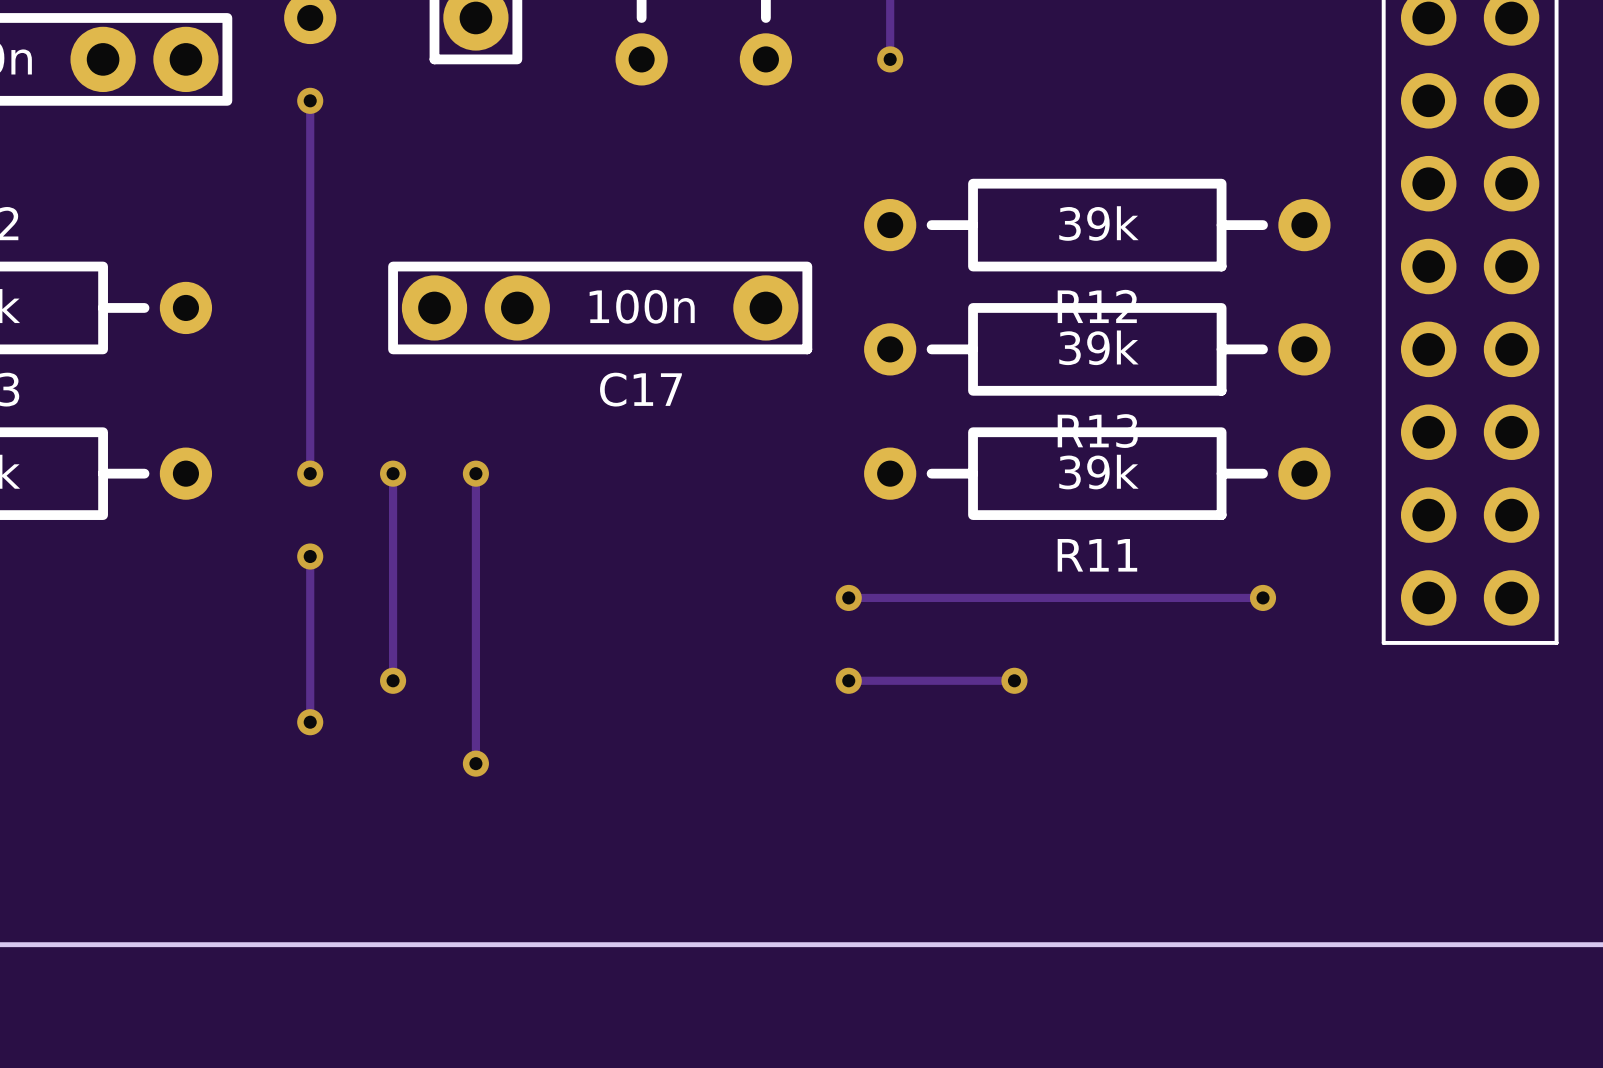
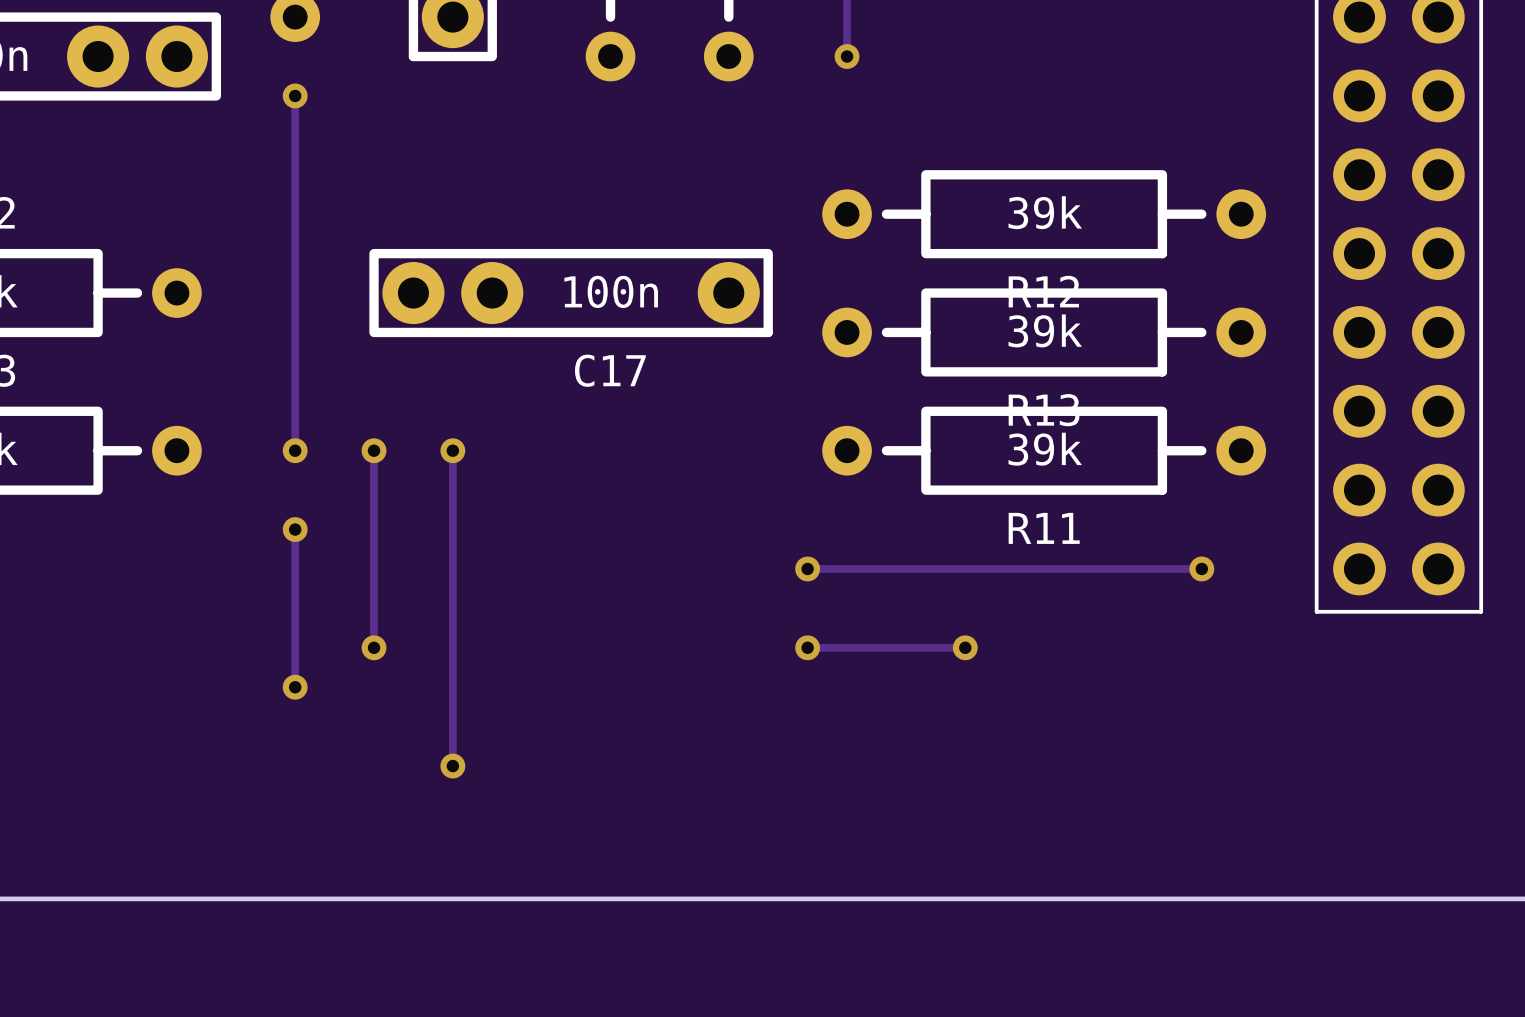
track: none -> (452, 726) (452, 766)
via position: (475, 763) -> (452, 766)

